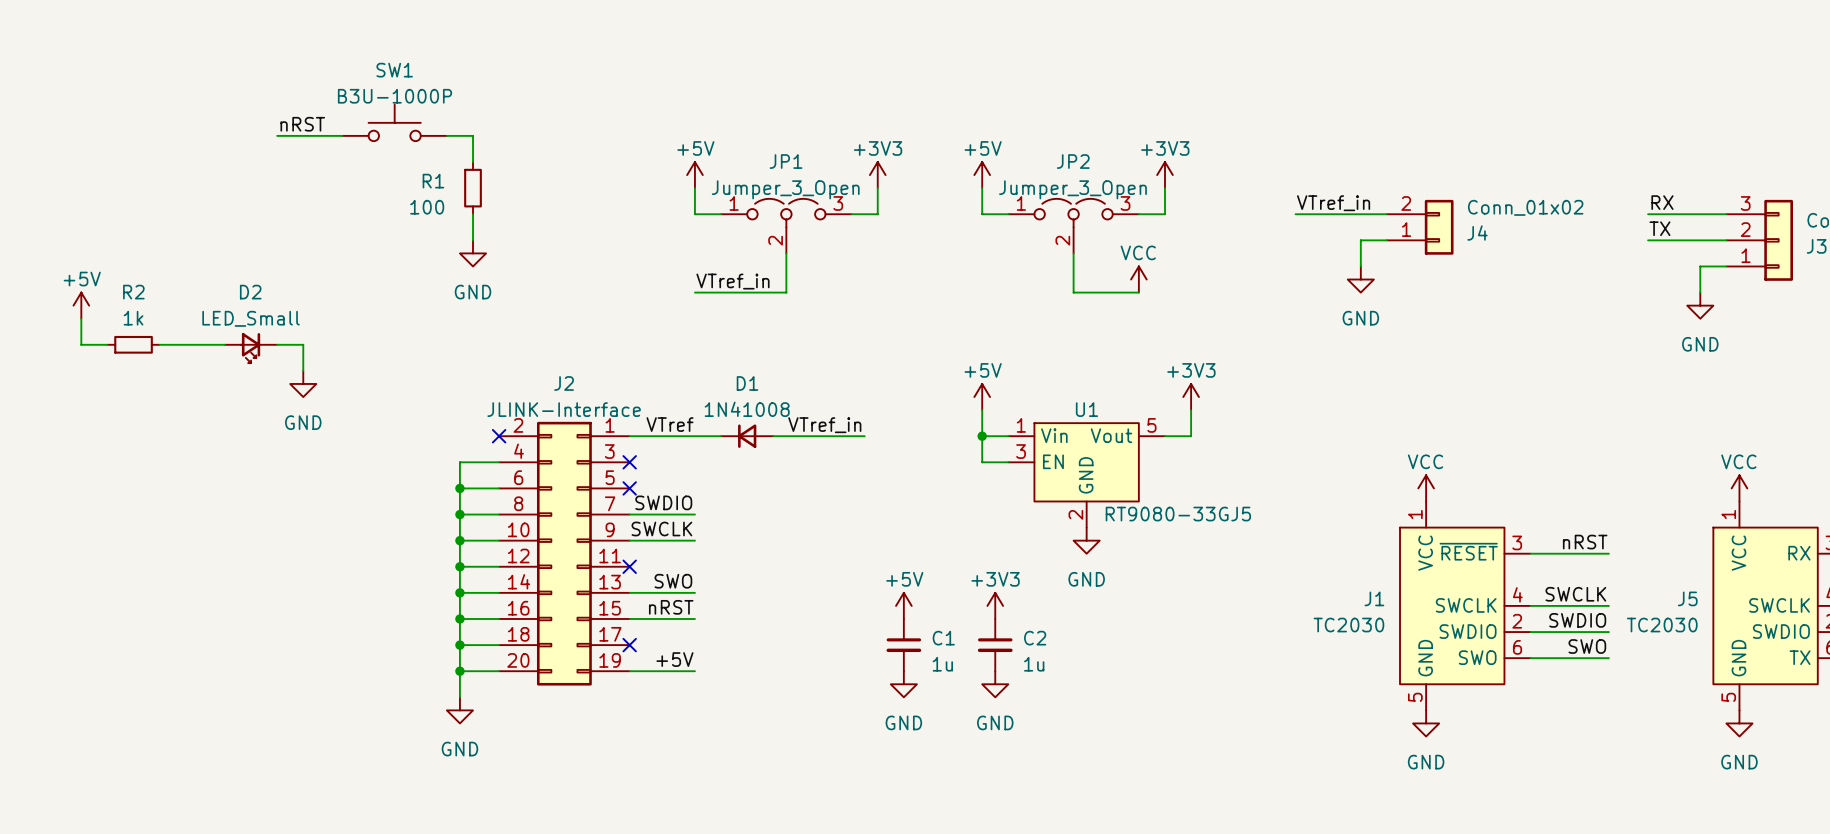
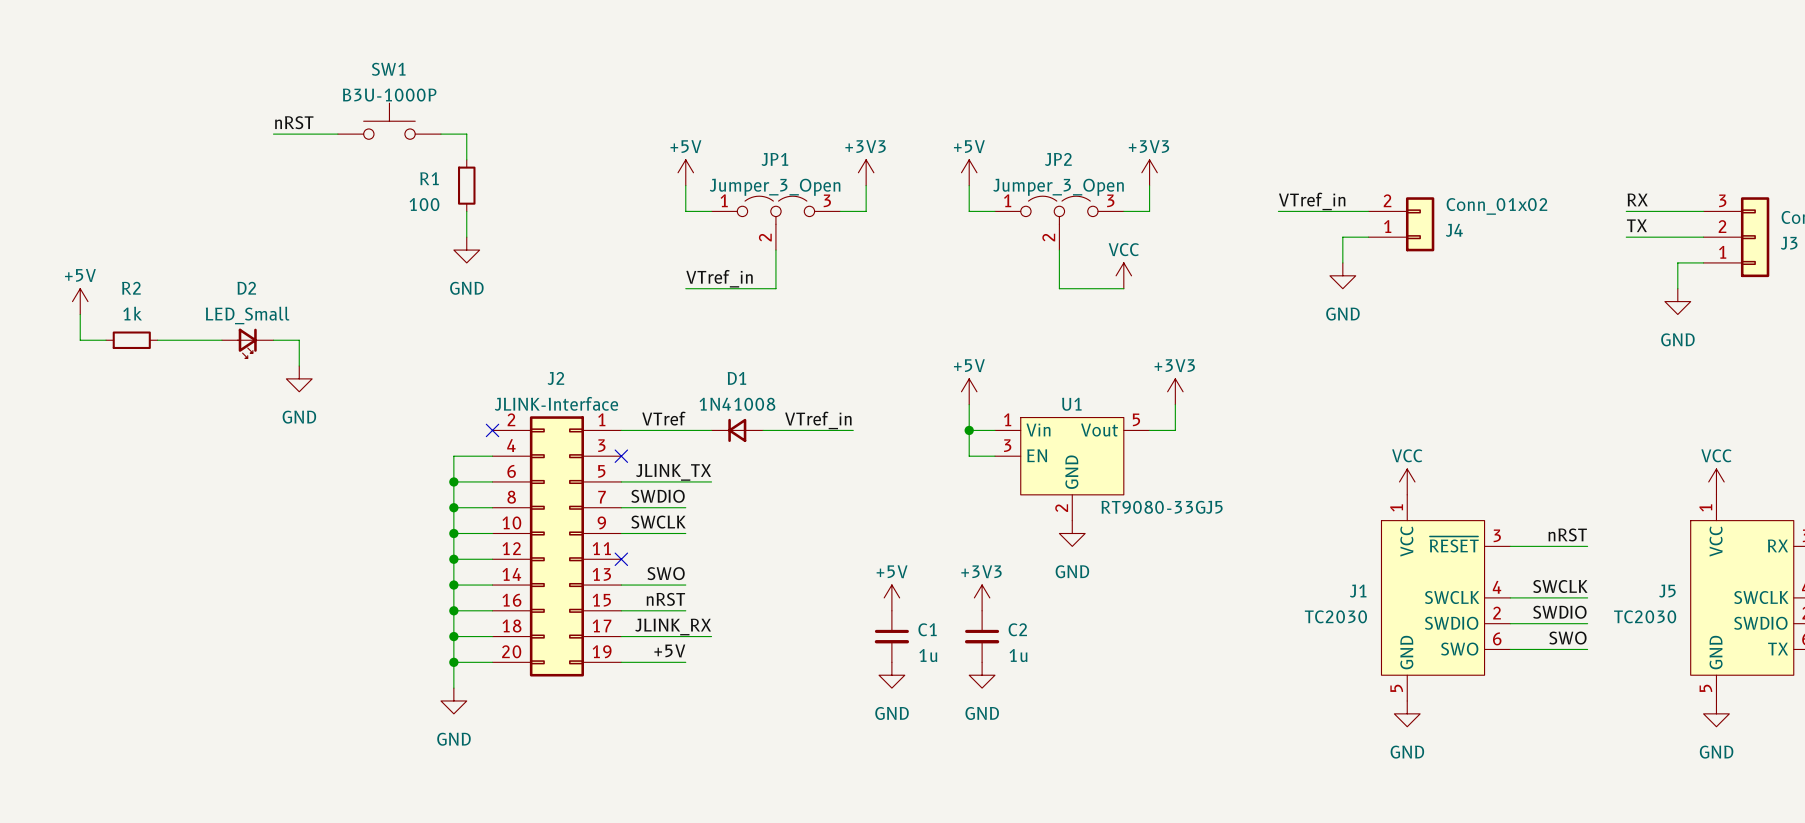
label: none -> JLINK_TX (673, 472)
wire: none -> (621, 481) (711, 481)
no-connect mark: (629, 488) -> none
label: none -> JLINK_RX (673, 627)
wire: none -> (621, 636) (711, 636)
no-connect mark: (629, 645) -> none

